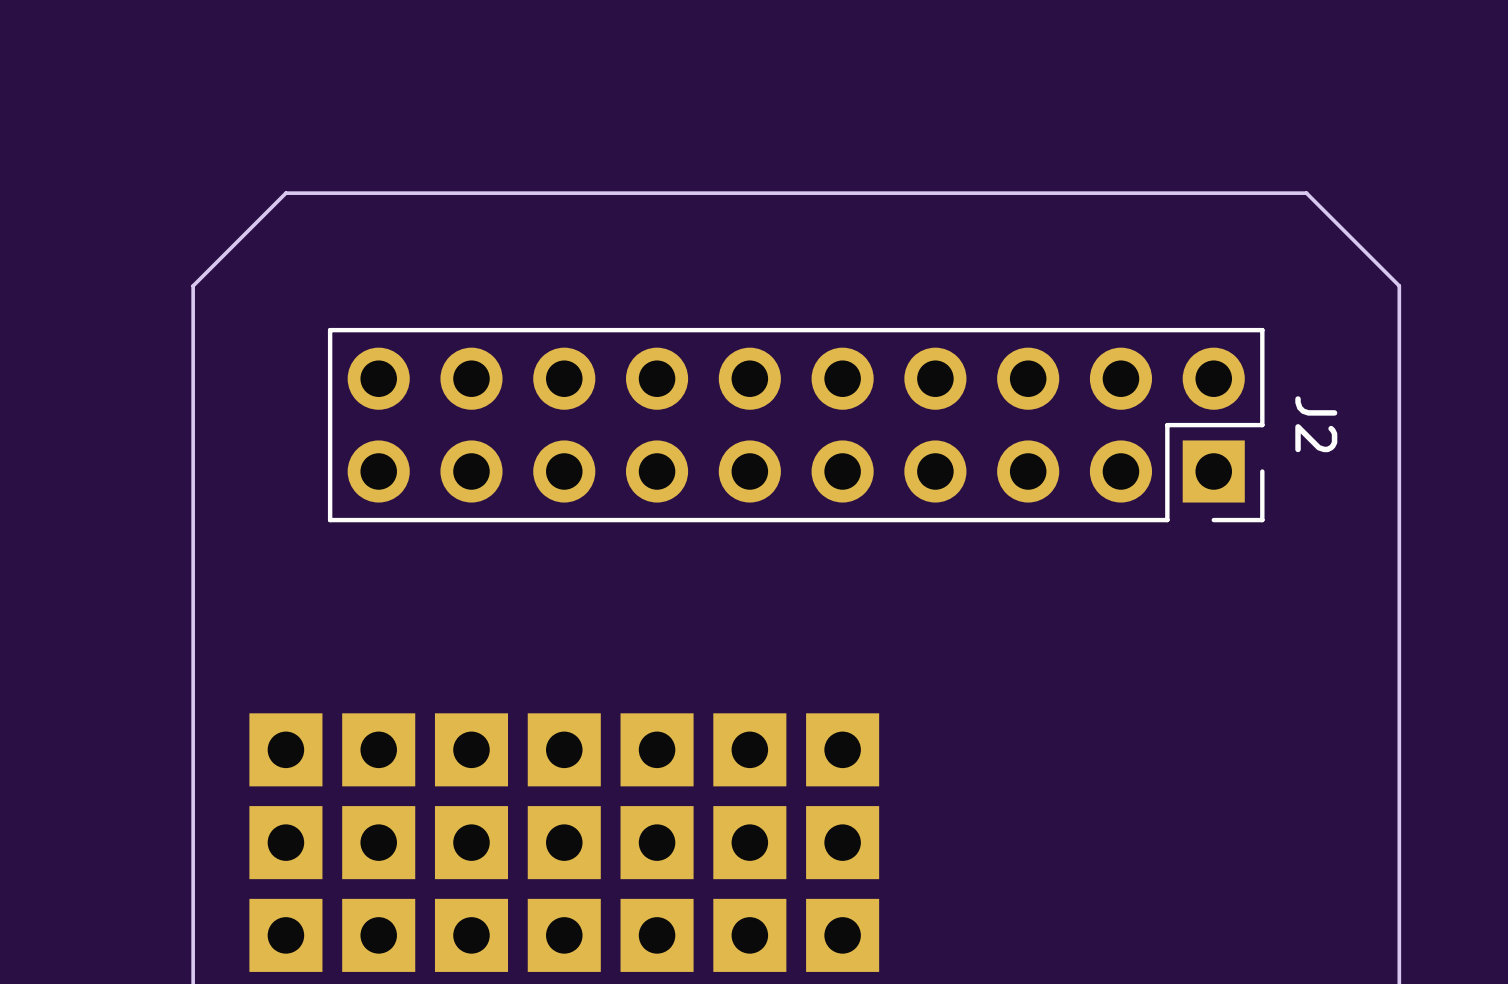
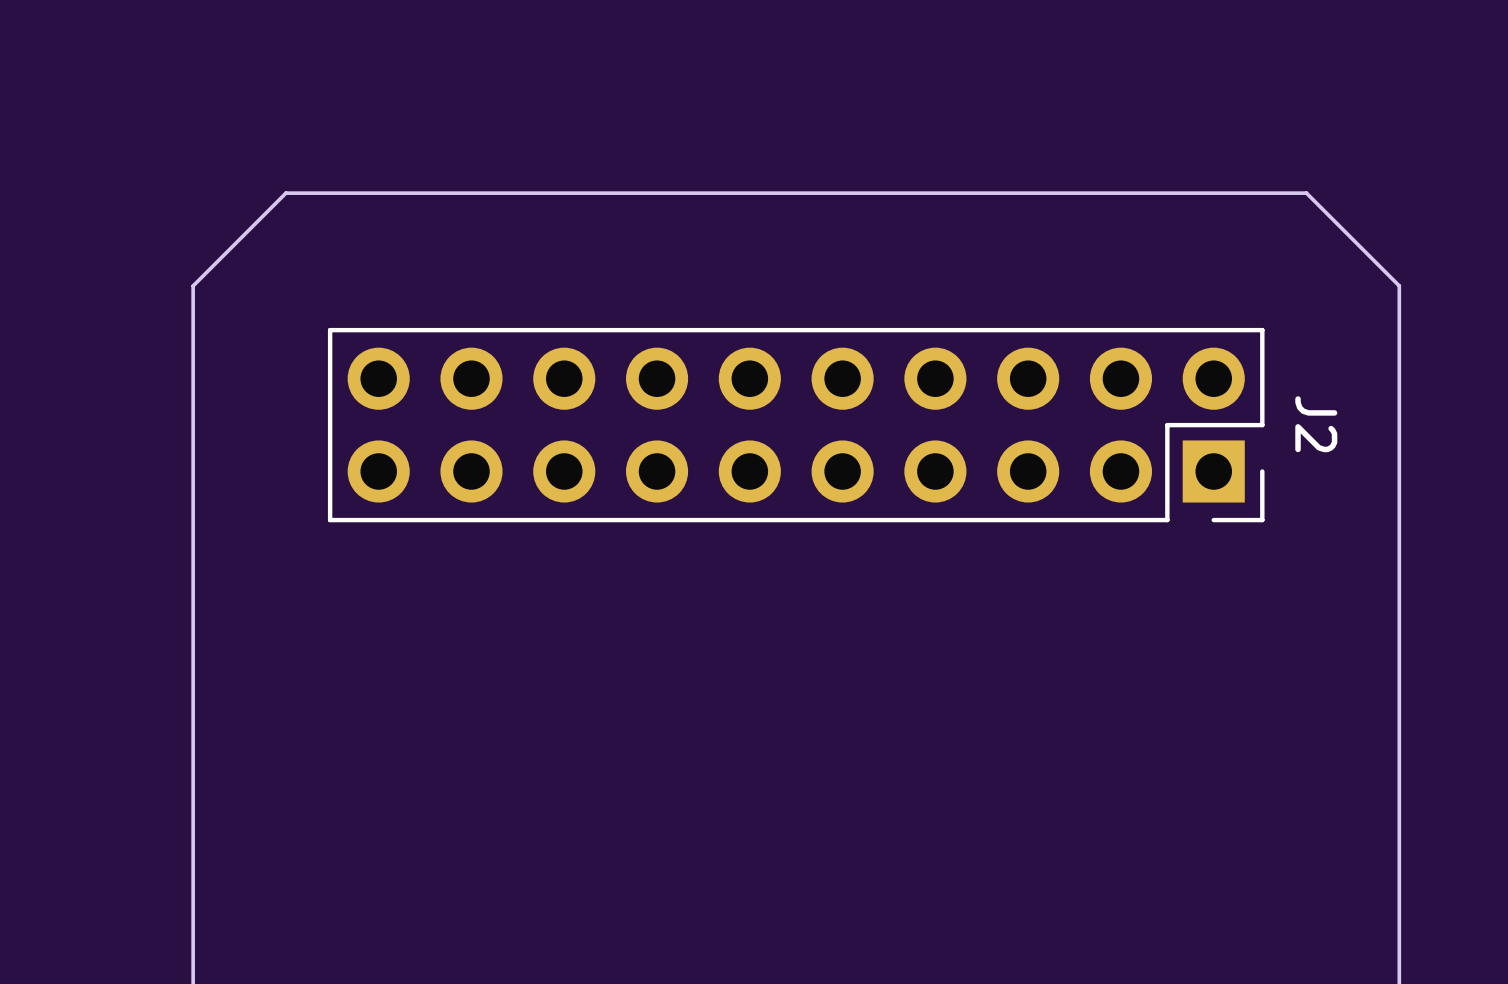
part: (285, 749) -> none
part: (378, 749) -> none
part: (471, 749) -> none
part: (564, 749) -> none
part: (657, 749) -> none
part: (749, 749) -> none
part: (842, 749) -> none
part: (285, 842) -> none
part: (378, 842) -> none
part: (471, 842) -> none
part: (564, 842) -> none
part: (657, 842) -> none
part: (749, 842) -> none
part: (842, 842) -> none
part: (285, 935) -> none
part: (378, 935) -> none
part: (471, 935) -> none
part: (564, 935) -> none
part: (657, 935) -> none
part: (749, 935) -> none
part: (842, 935) -> none

